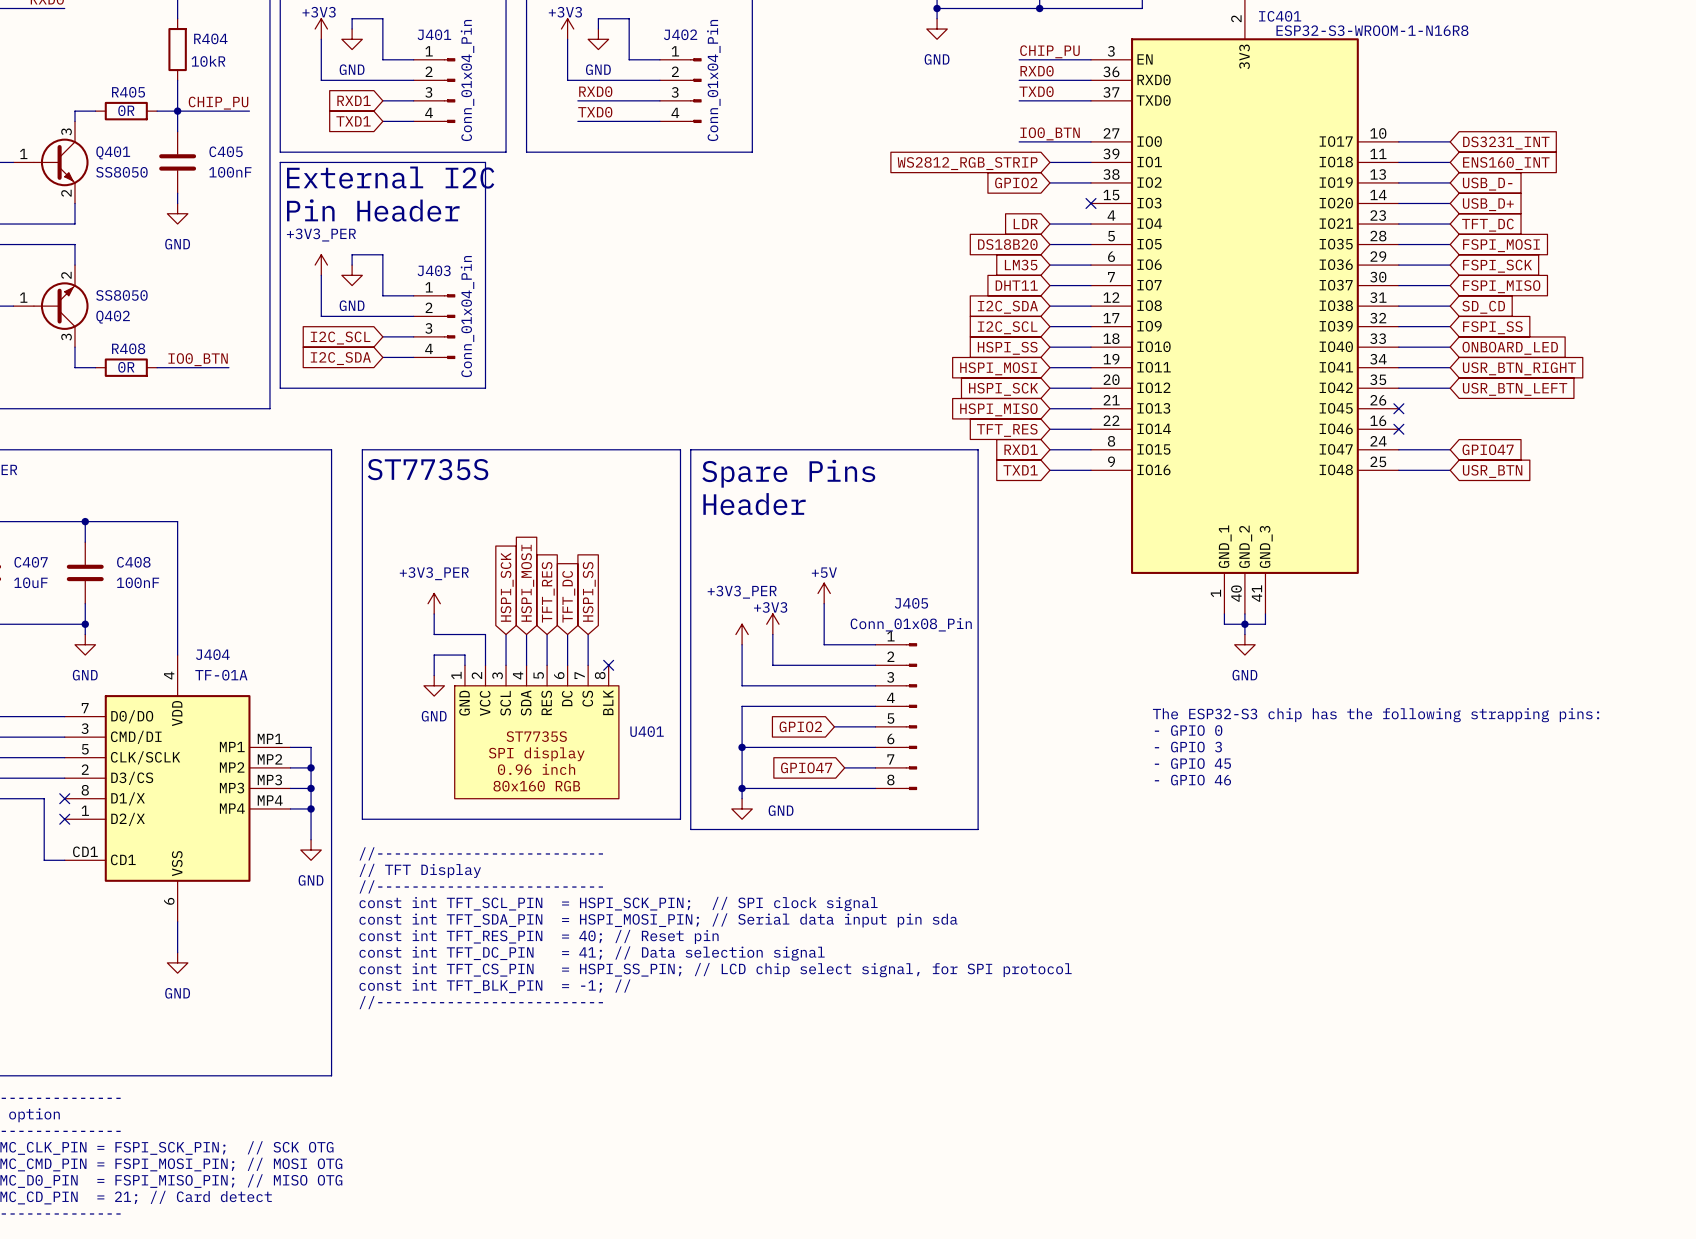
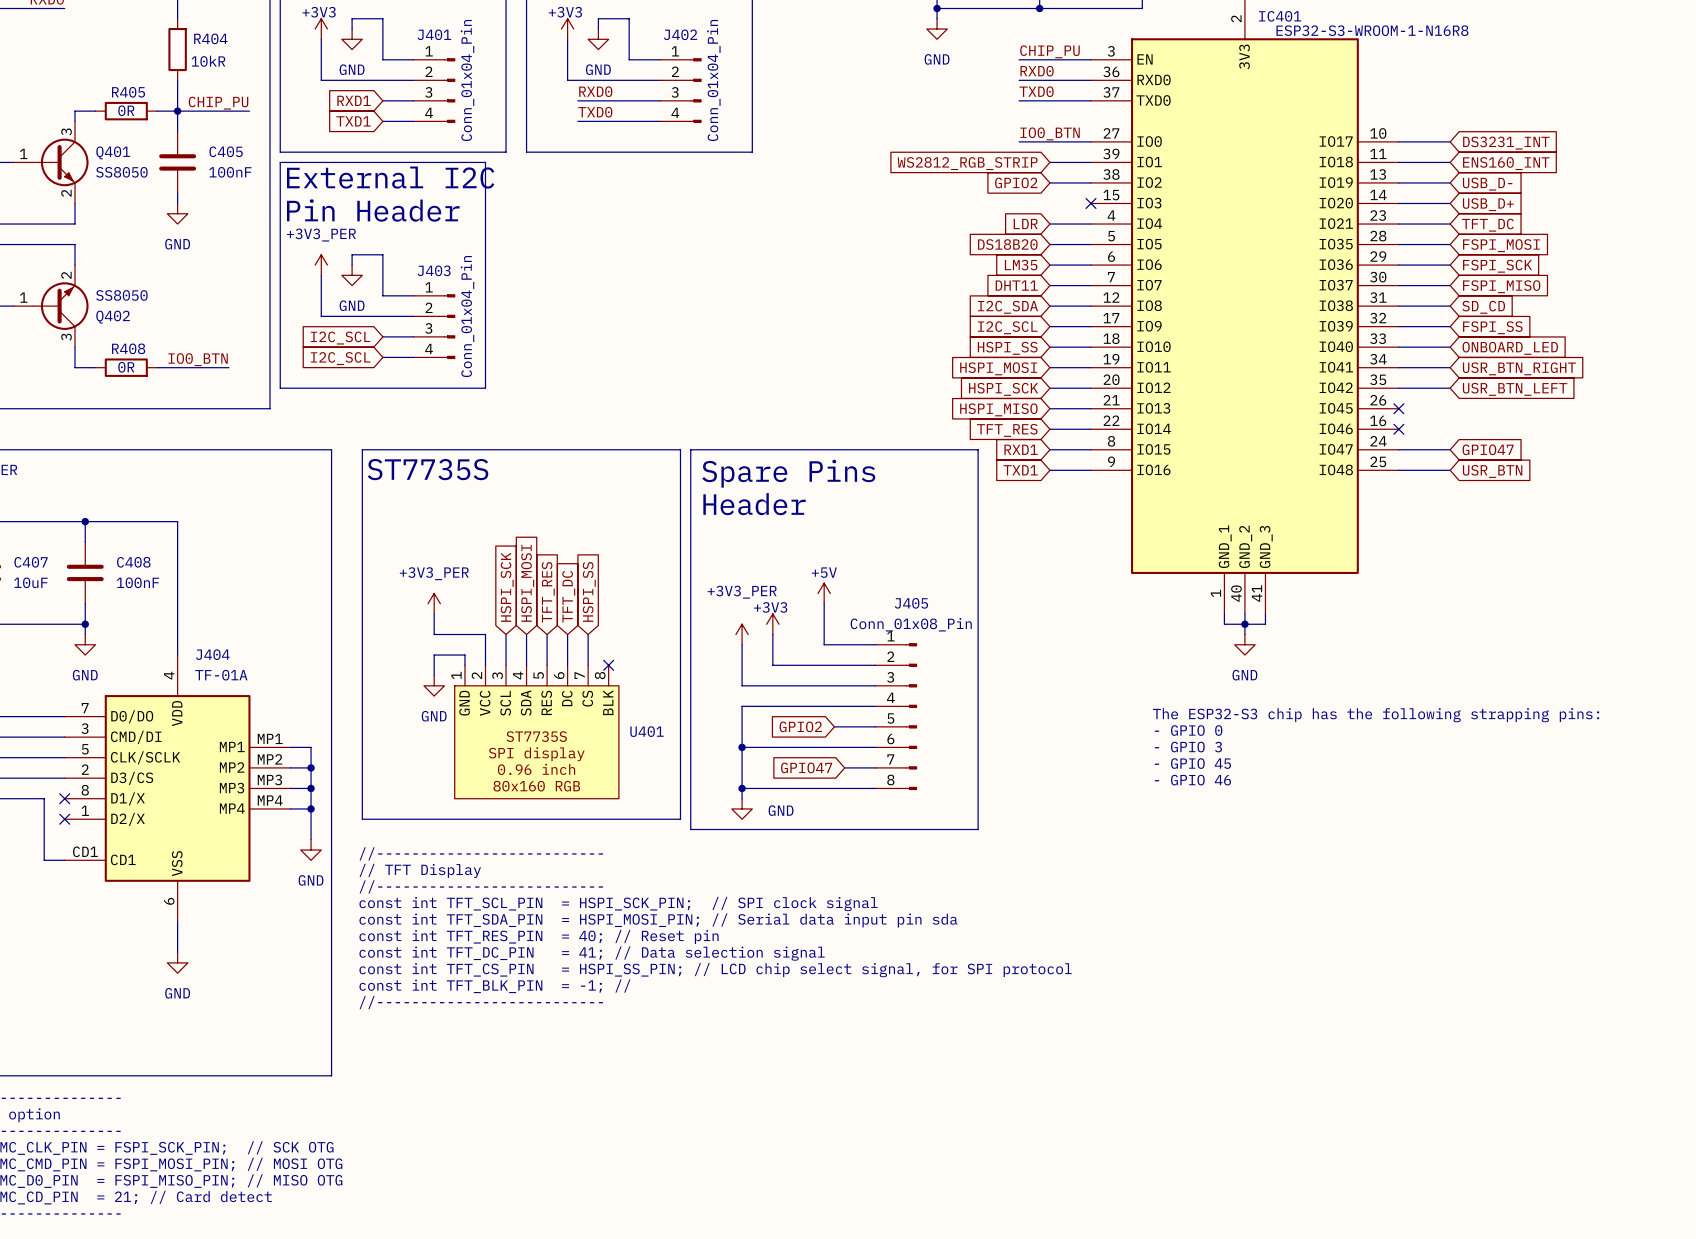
global label: I2C_SDA (340, 358) -> I2C_SCL (340, 358)

